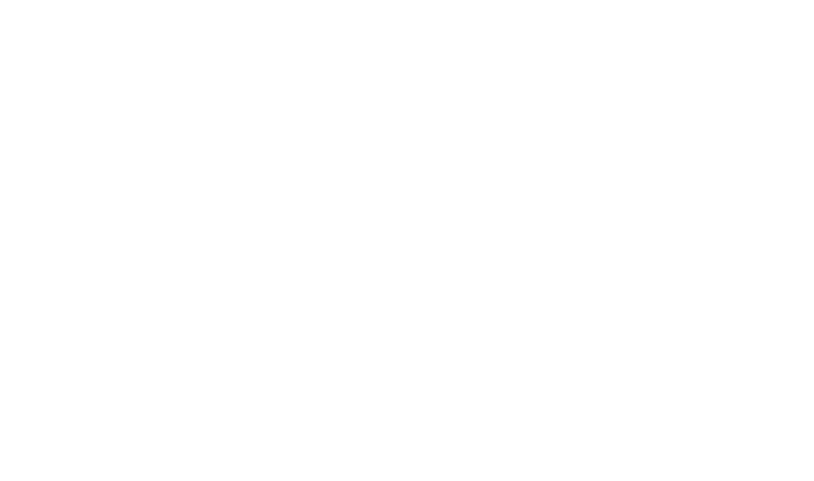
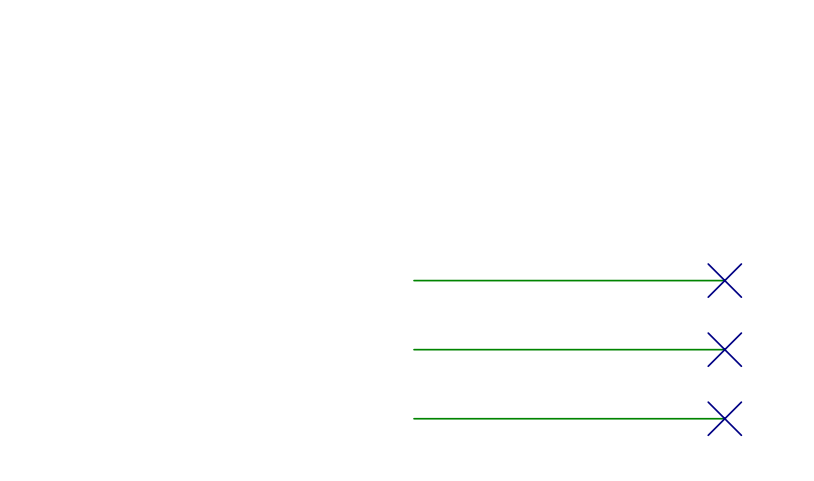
wire: none -> (414, 280) (724, 280)
no-connect mark: none -> (724, 280)
wire: none -> (414, 349) (724, 349)
no-connect mark: none -> (724, 349)
wire: none -> (414, 418) (724, 418)
no-connect mark: none -> (724, 418)

